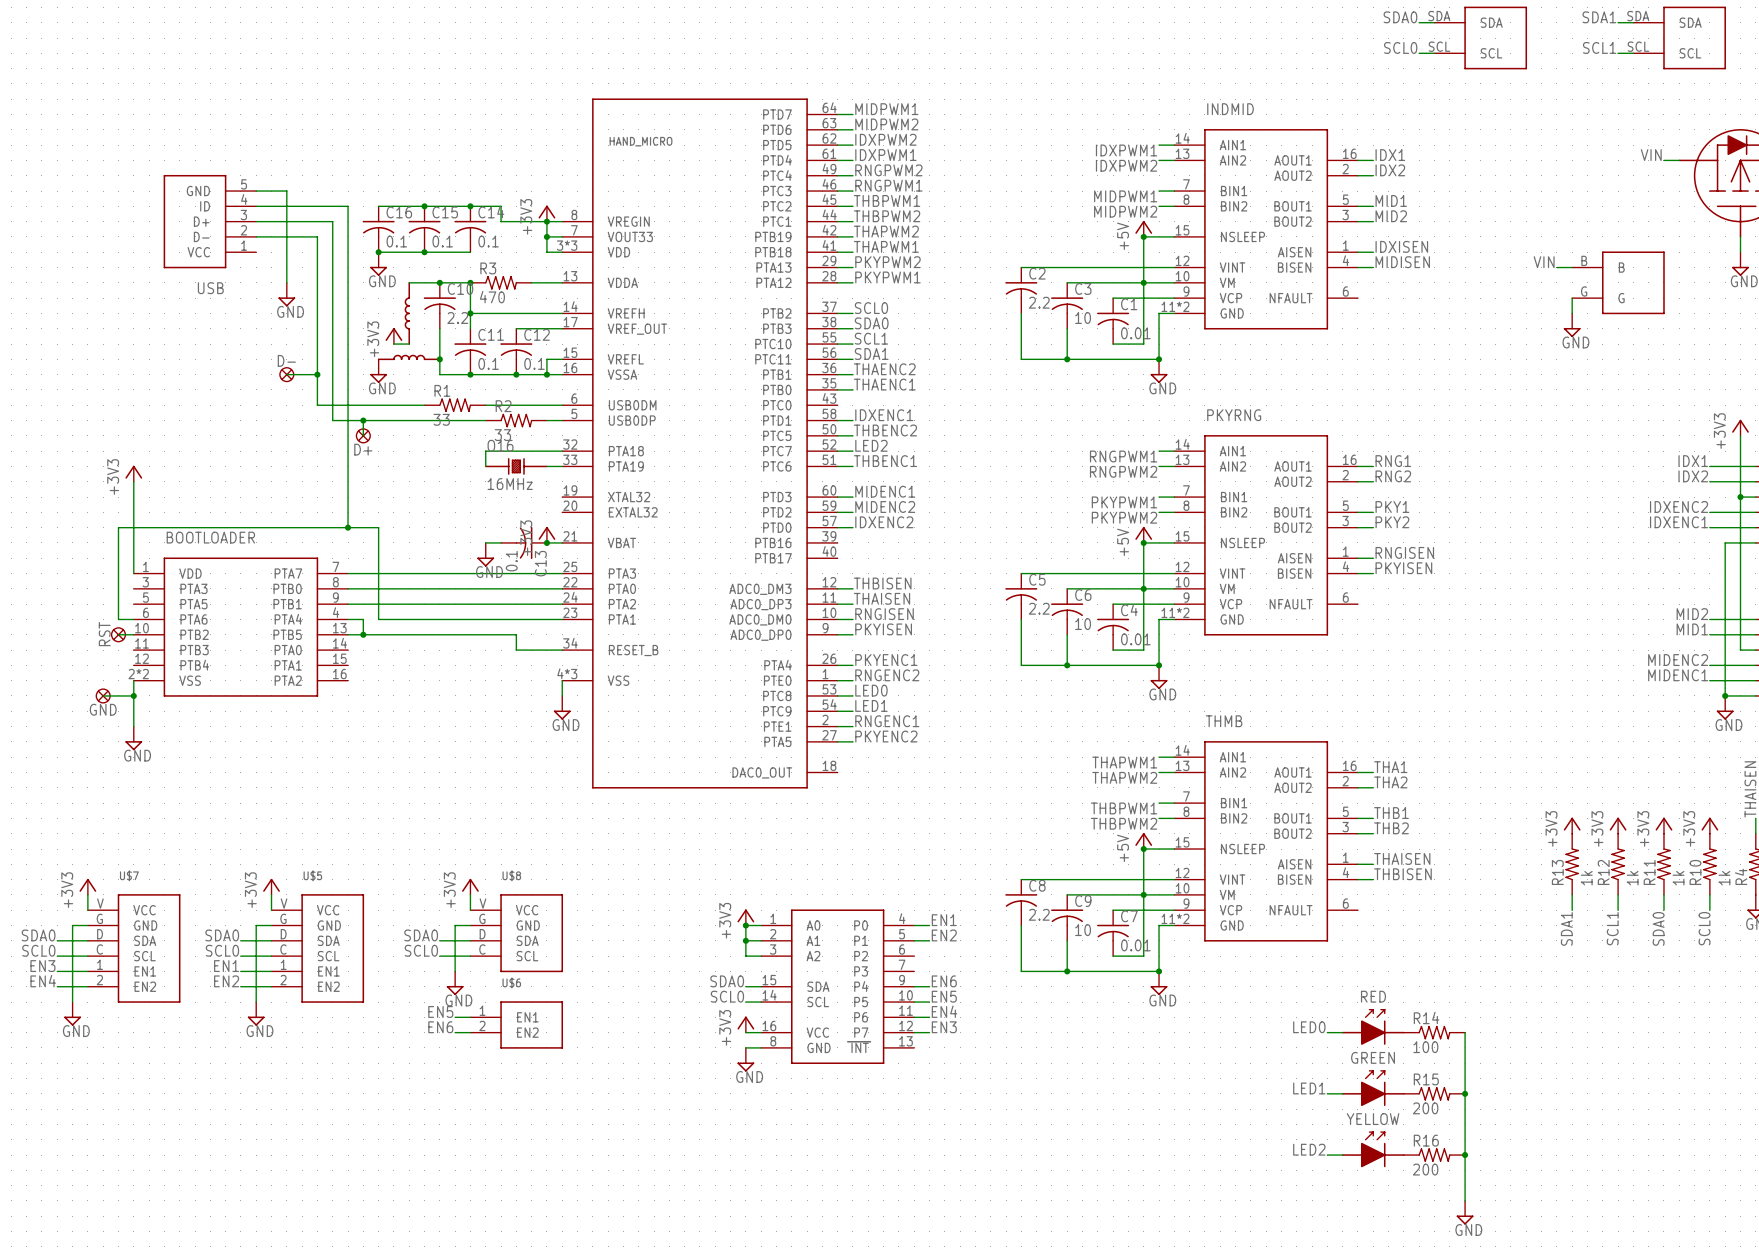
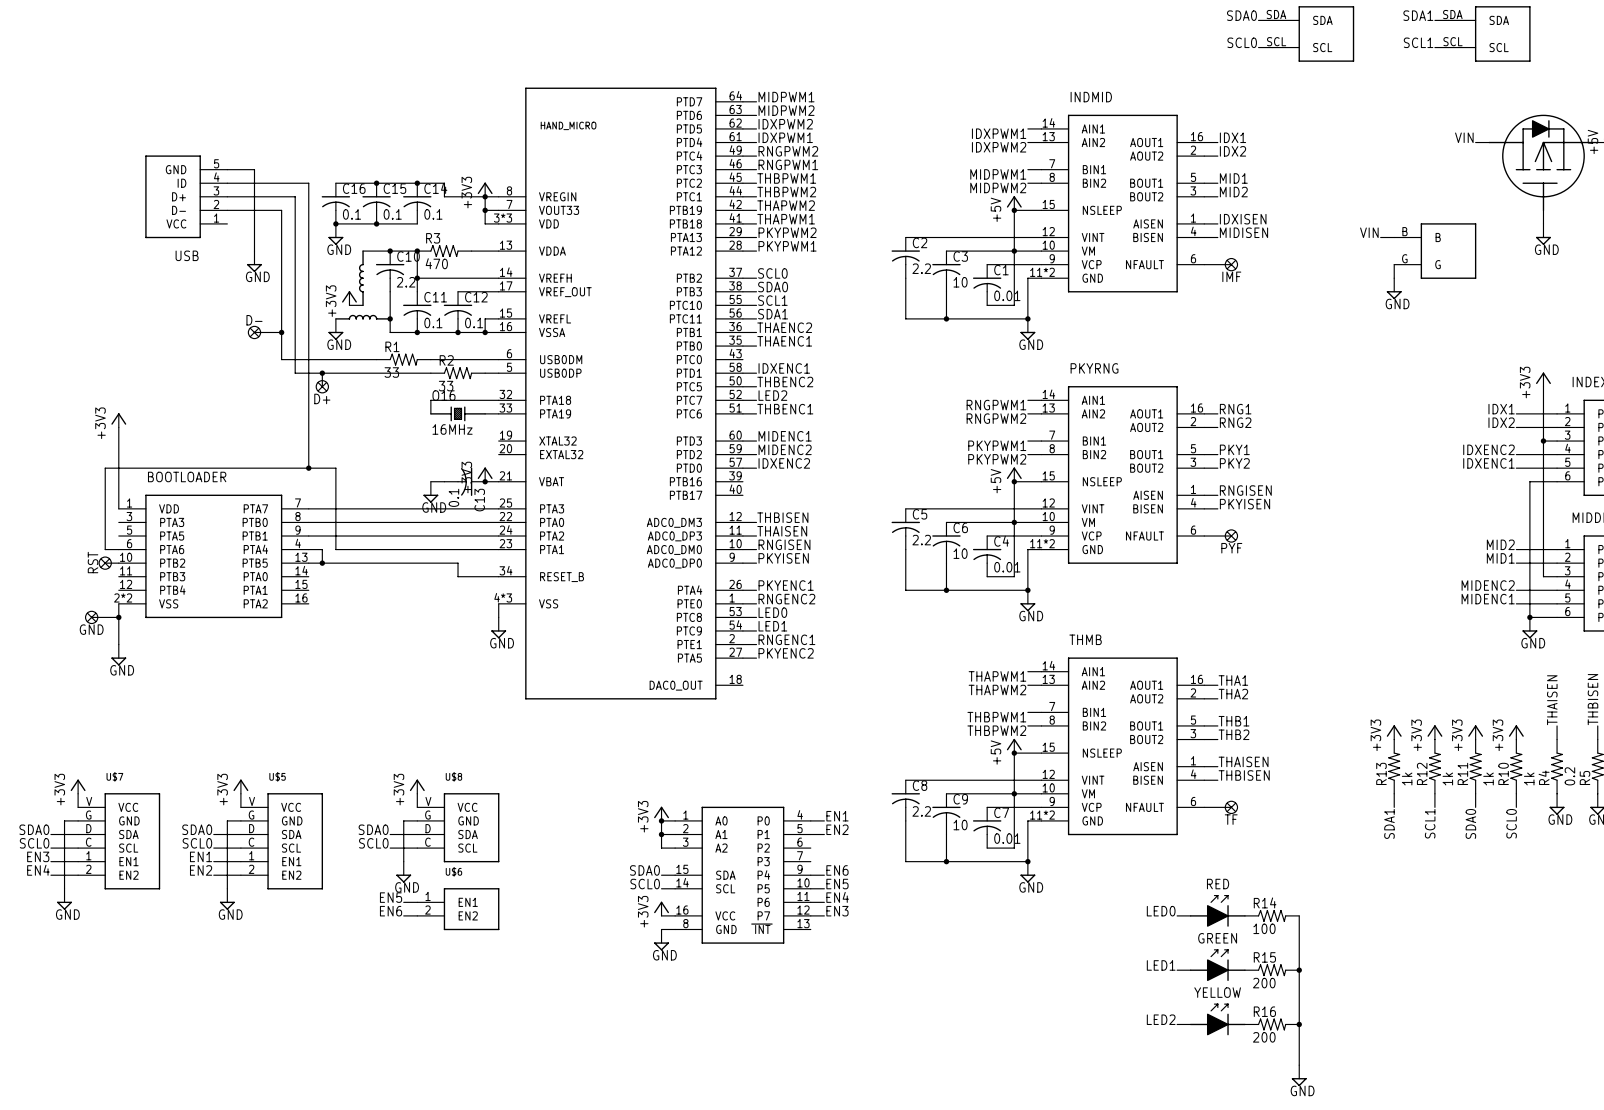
wire: none -> (1204, 264) (1231, 264)
IMF: none -> (1231, 264)
wire: none -> (1204, 536) (1231, 536)
PYF: none -> (1231, 536)
wire: none -> (1204, 807) (1231, 807)
TF: none -> (1231, 807)

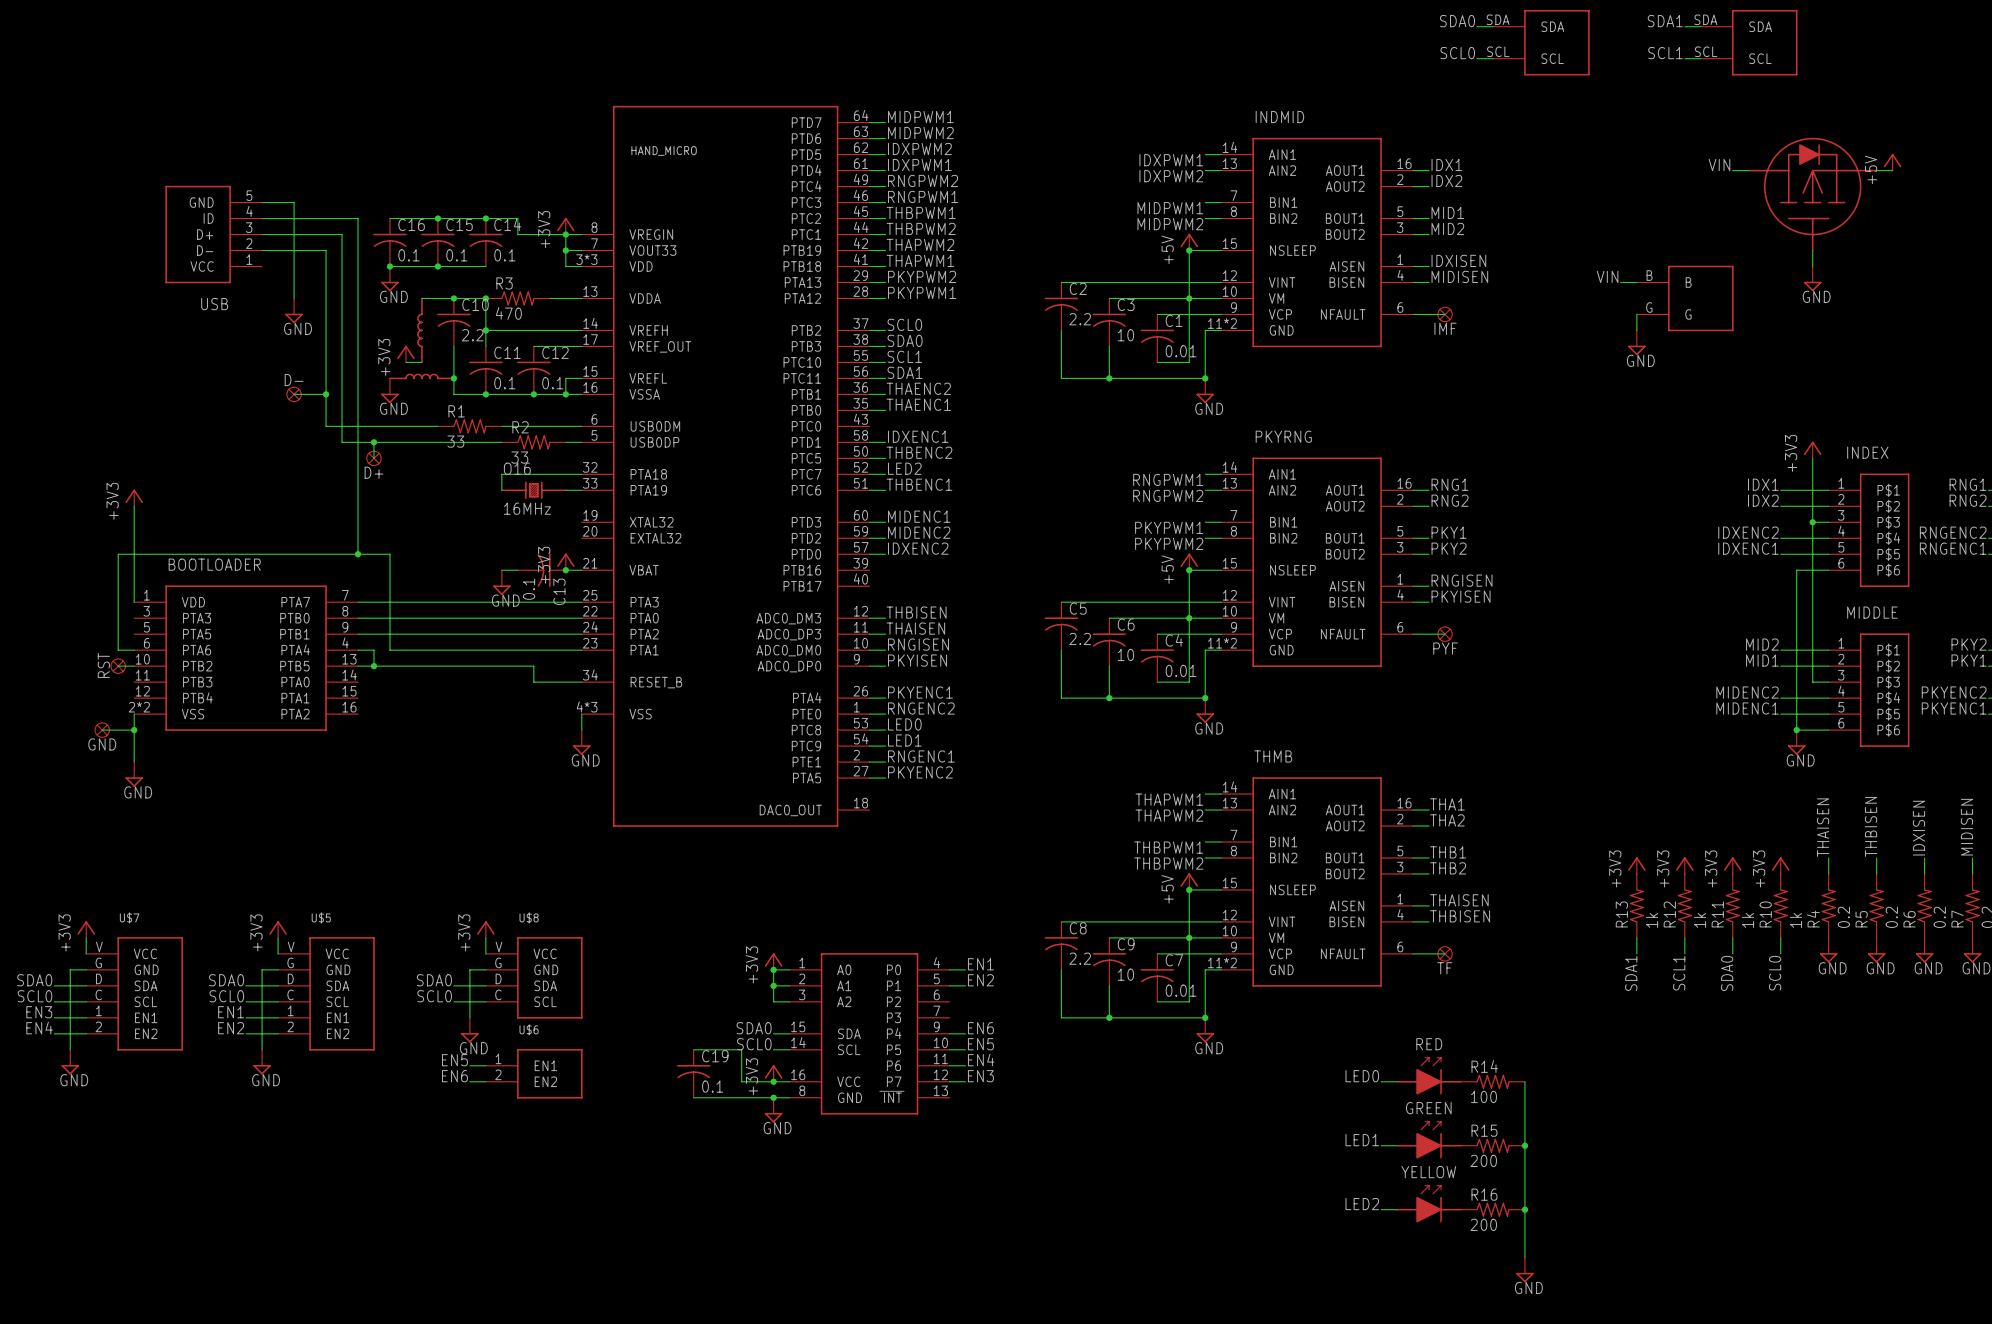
wire: none -> (693, 1049) (741, 1049) (741, 1081) (773, 1081)
C19: none -> 0.1 (693, 1073)
junction: none -> (773, 1081)
wire: none -> (693, 1097) (773, 1097)
junction: none -> (773, 1097)

